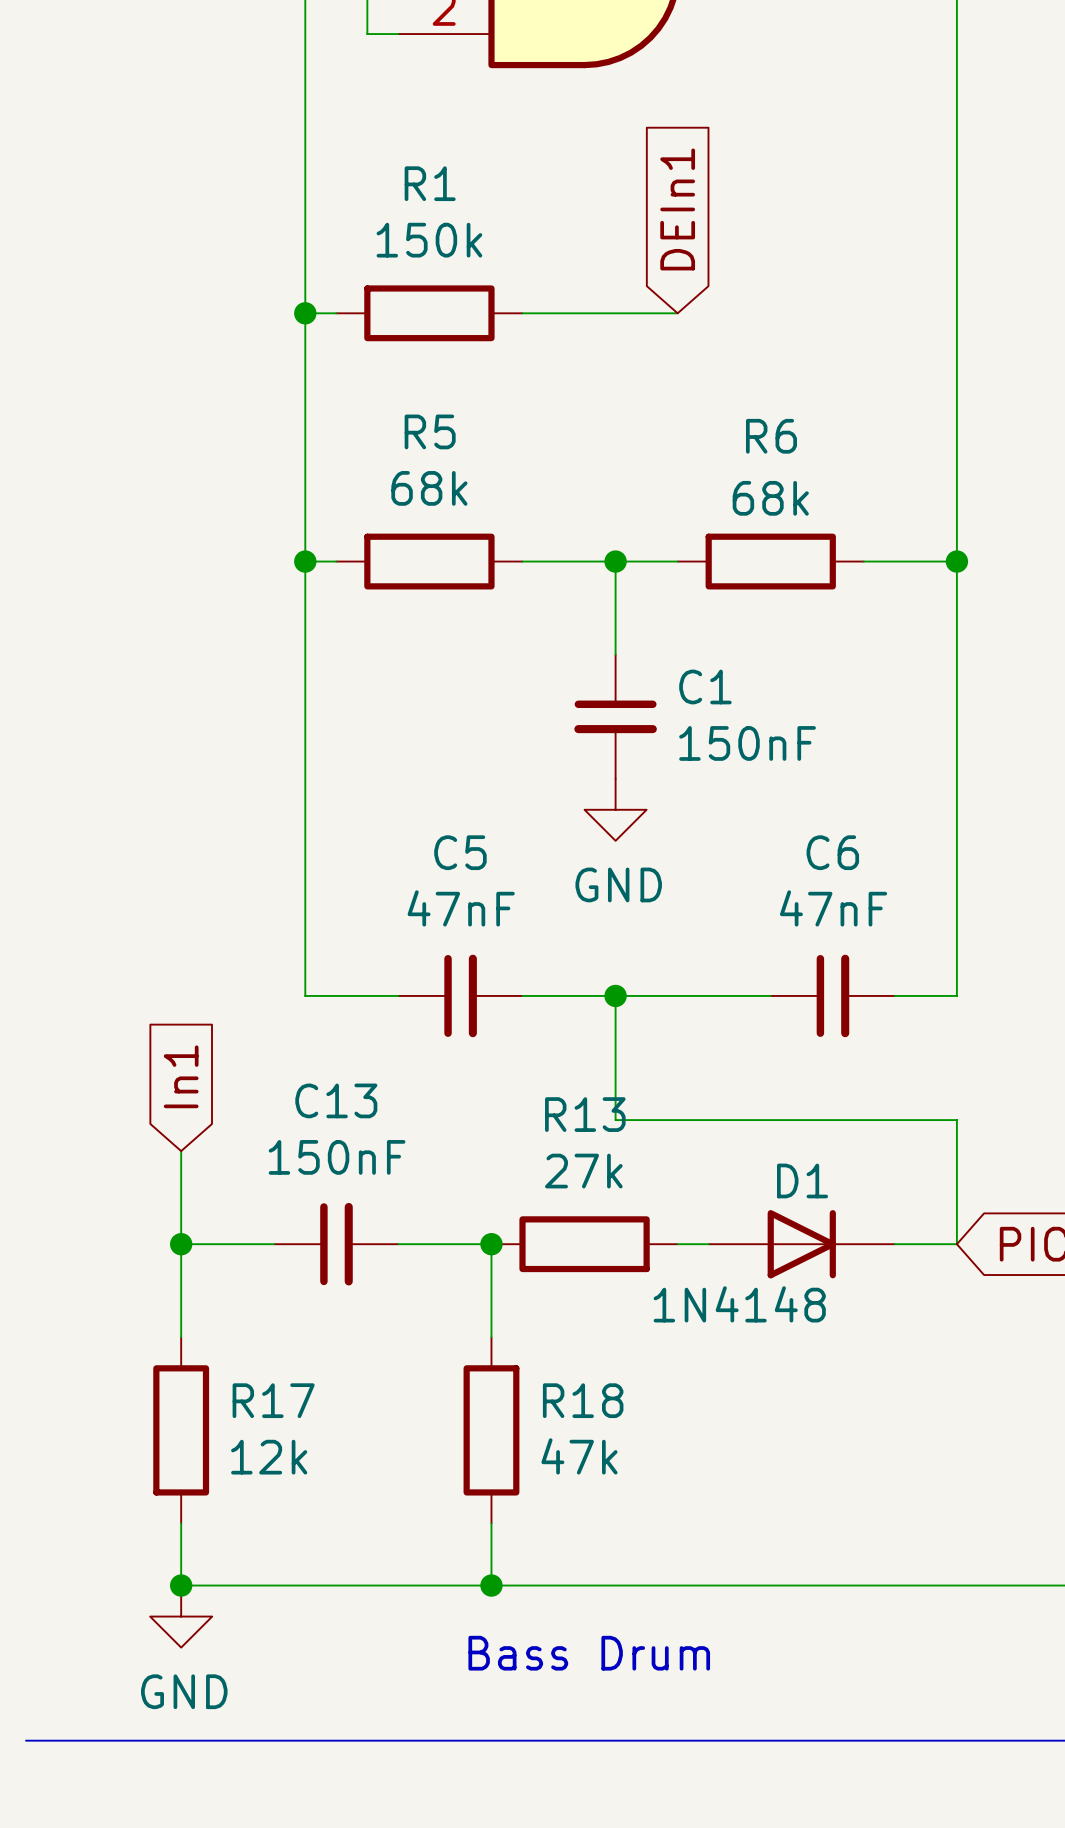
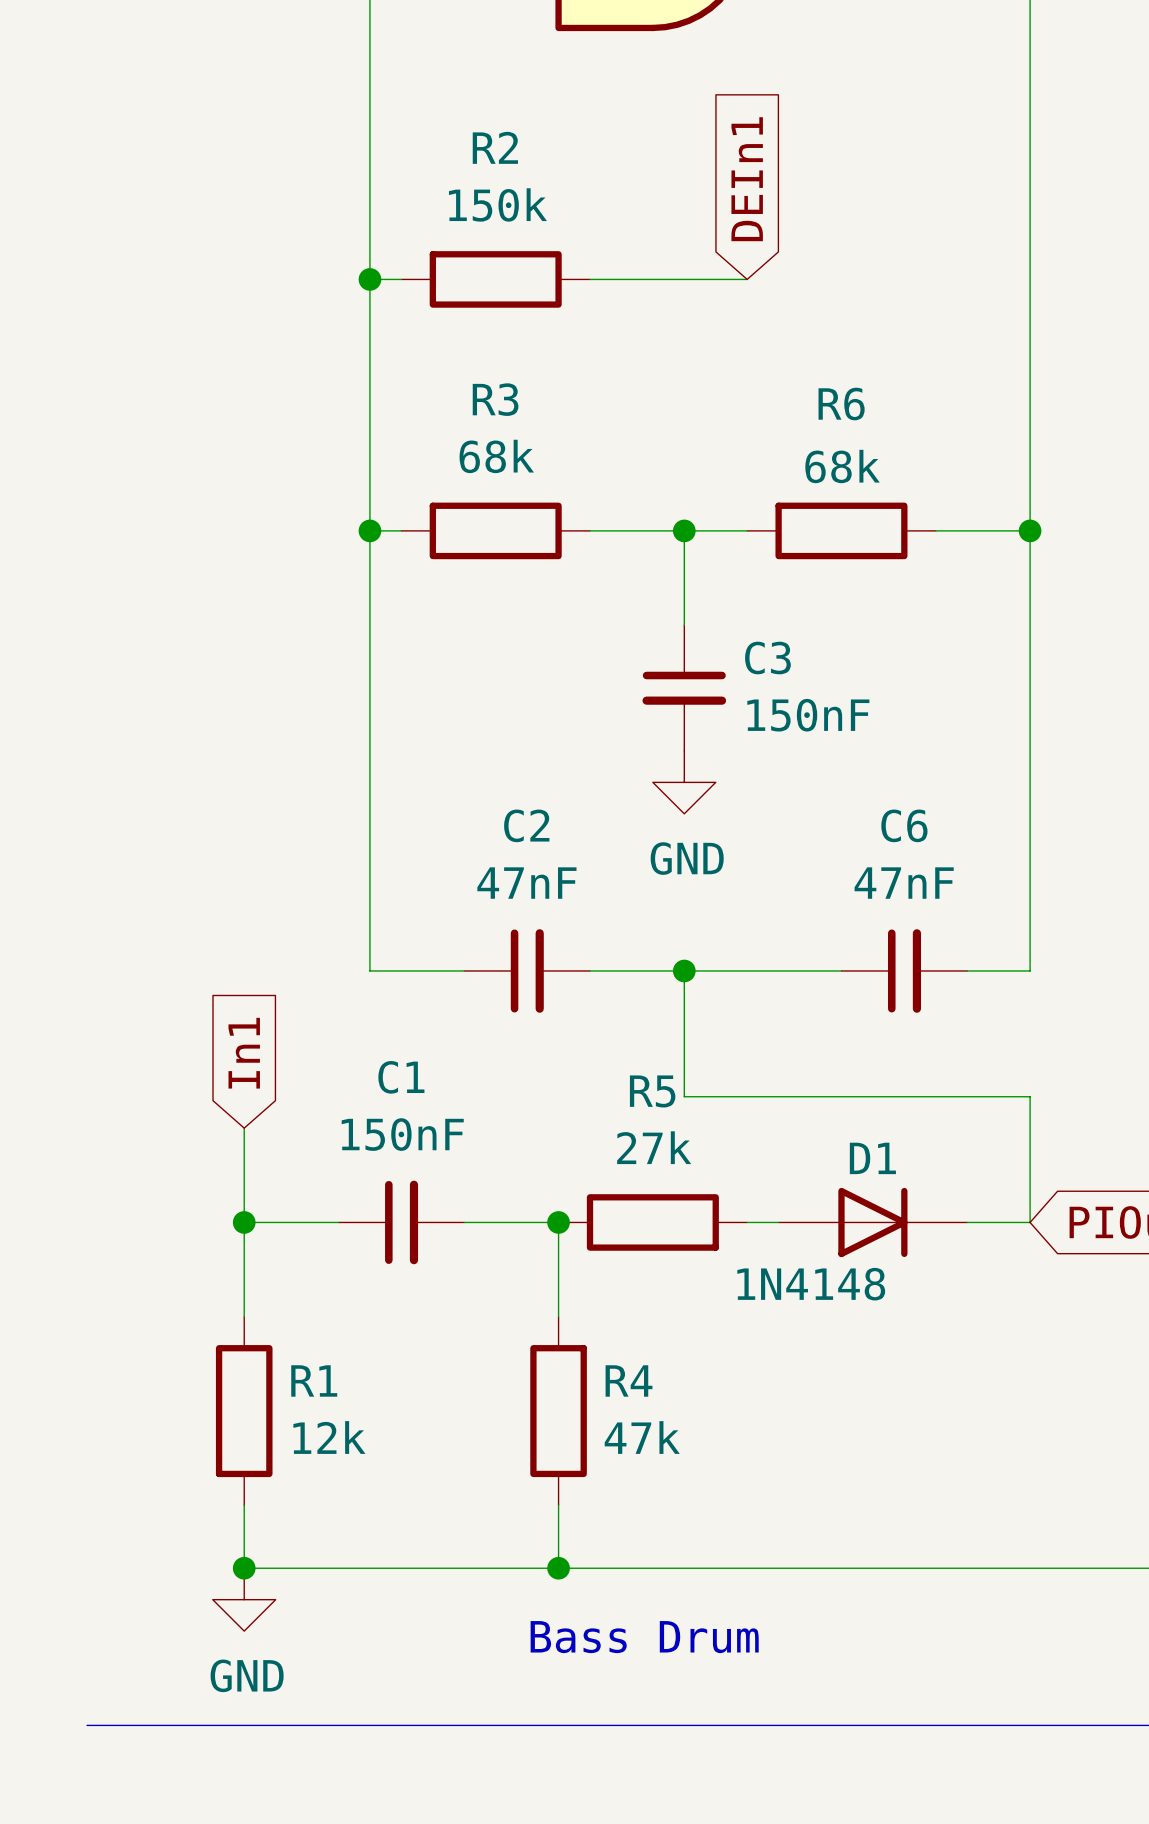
R1 name: R1 (430, 183) -> R2 (495, 147)
R5 name: R5 (430, 431) -> R3 (495, 399)
C1 name: C1 (705, 686) -> C3 (767, 658)
C5 name: C5 (460, 852) -> C2 (526, 825)
C13 name: C13 (336, 1100) -> C1 (401, 1077)
R13 name: R13 (585, 1114) -> R5 (652, 1091)
R17 name: R17 (273, 1400) -> R1 (314, 1380)
R18 name: R18 (583, 1400) -> R4 (629, 1380)

